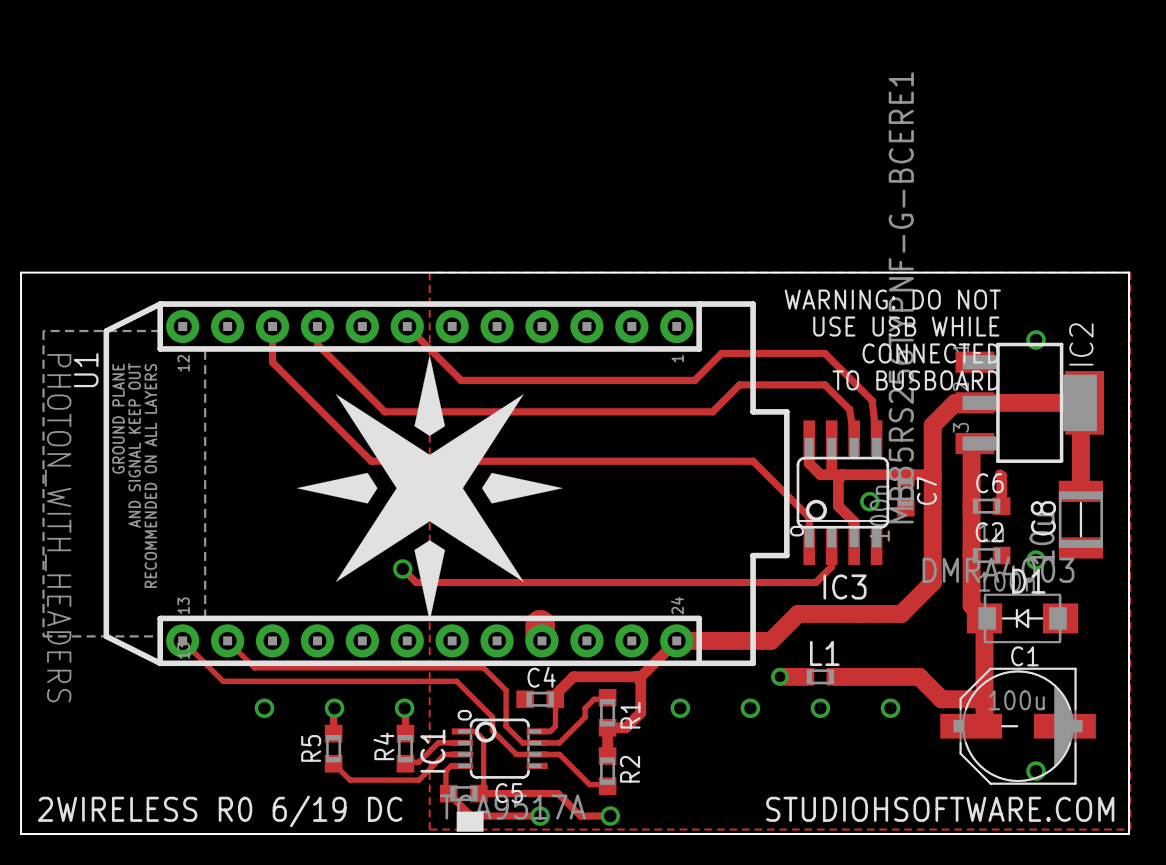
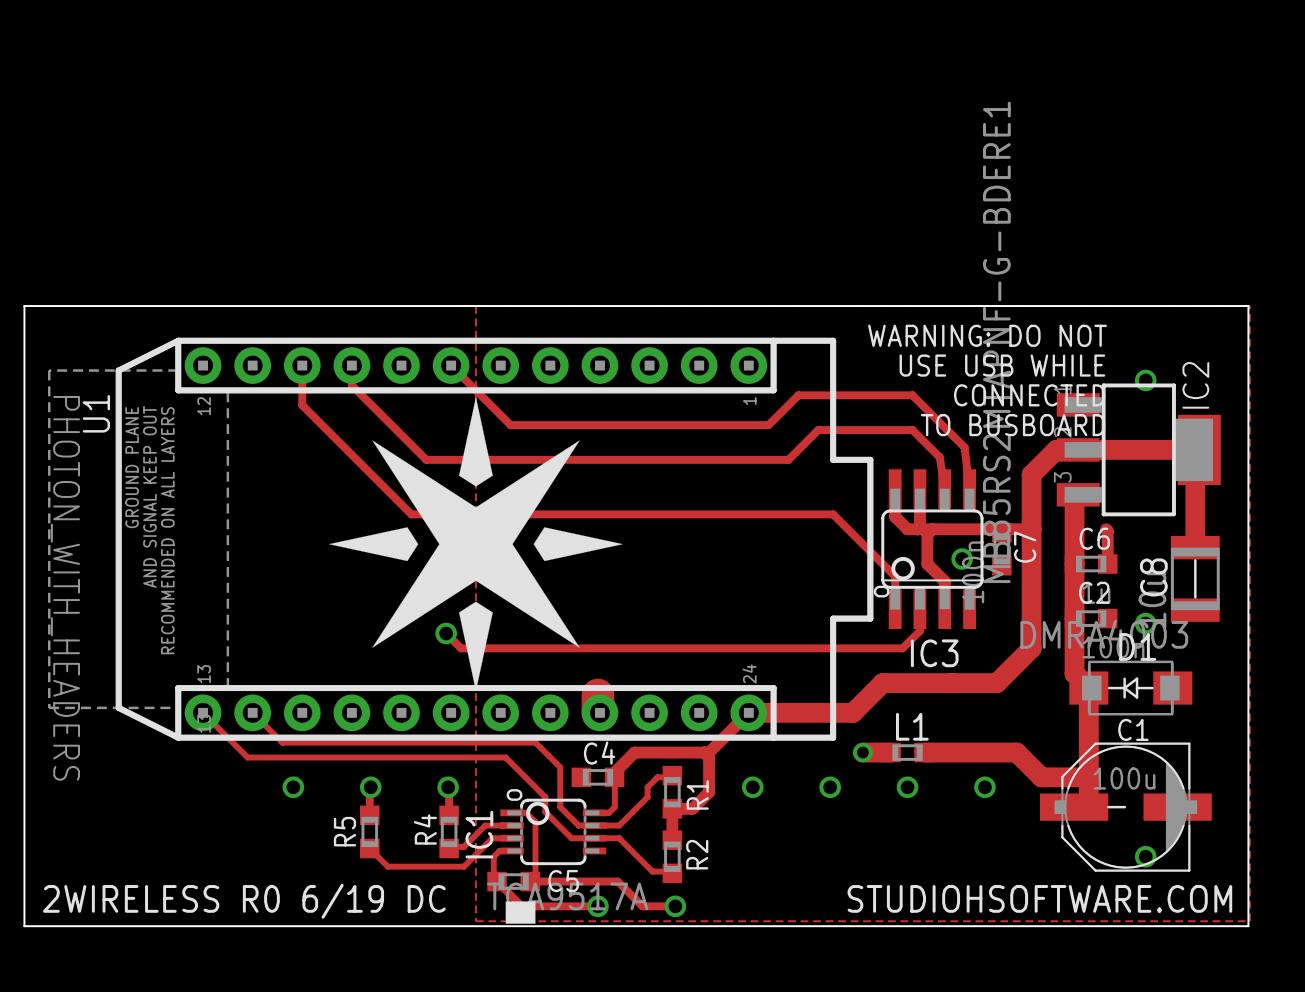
IC3 value: MB85RS256TYPNF-G-BCERE1 (901, 297) -> MB85RS2MTAPNF-G-BDERE1 (996, 342)

